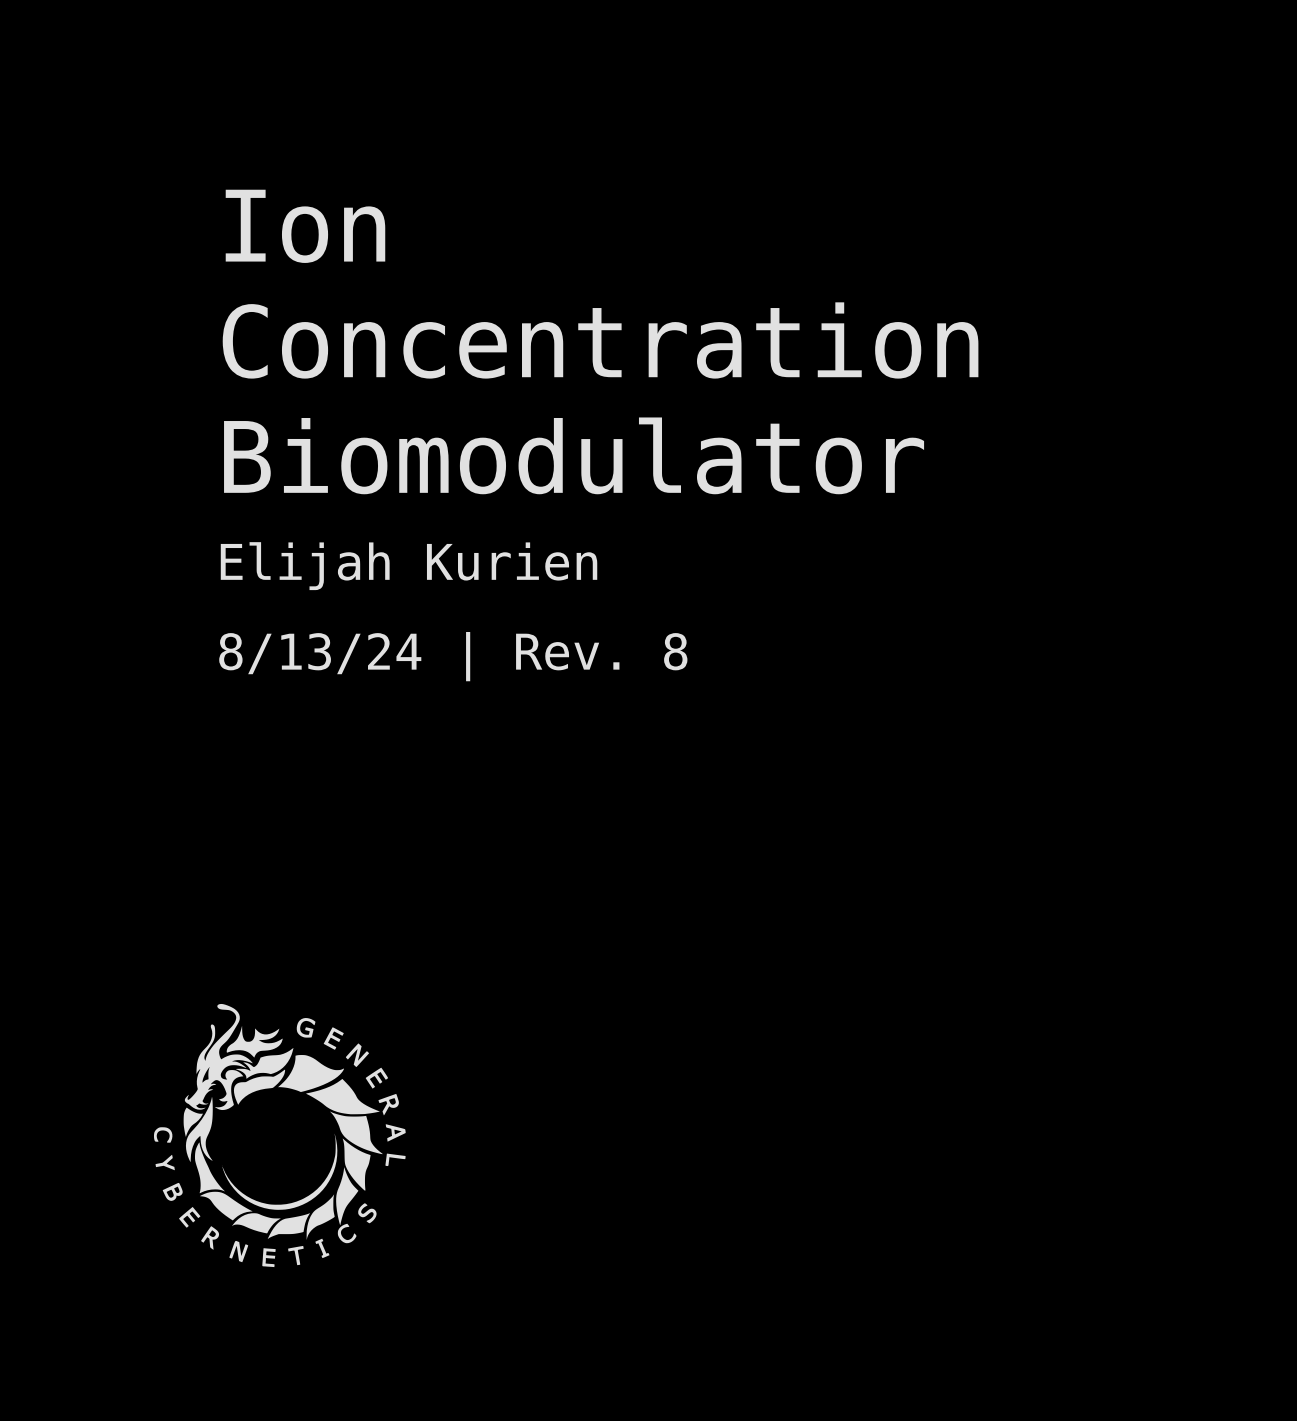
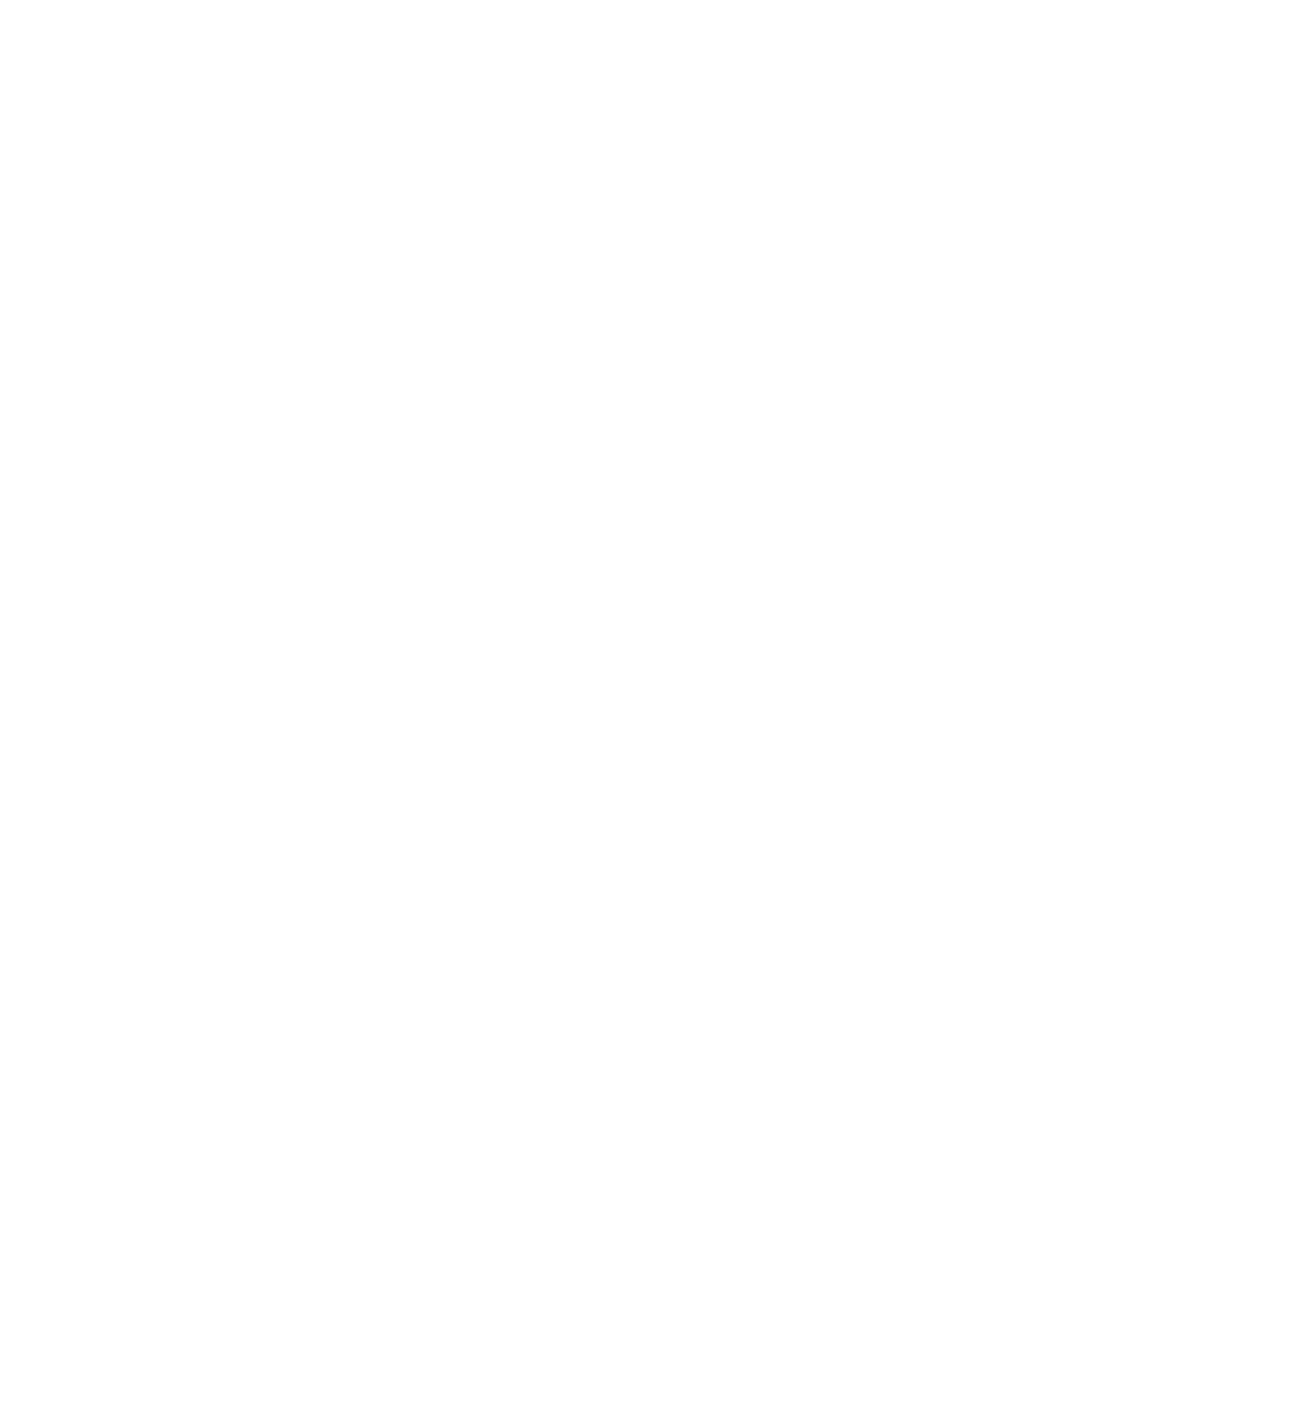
text: Ion (305, 226) -> none
text: Concentration (600, 340) -> none
text: Biomodulator (574, 455) -> none
text: Elijah Kurien (409, 566) -> none
text: 8/13/24 | Rev. 8 (453, 656) -> none
drawing: [153, 1003, 406, 1268] -> none

